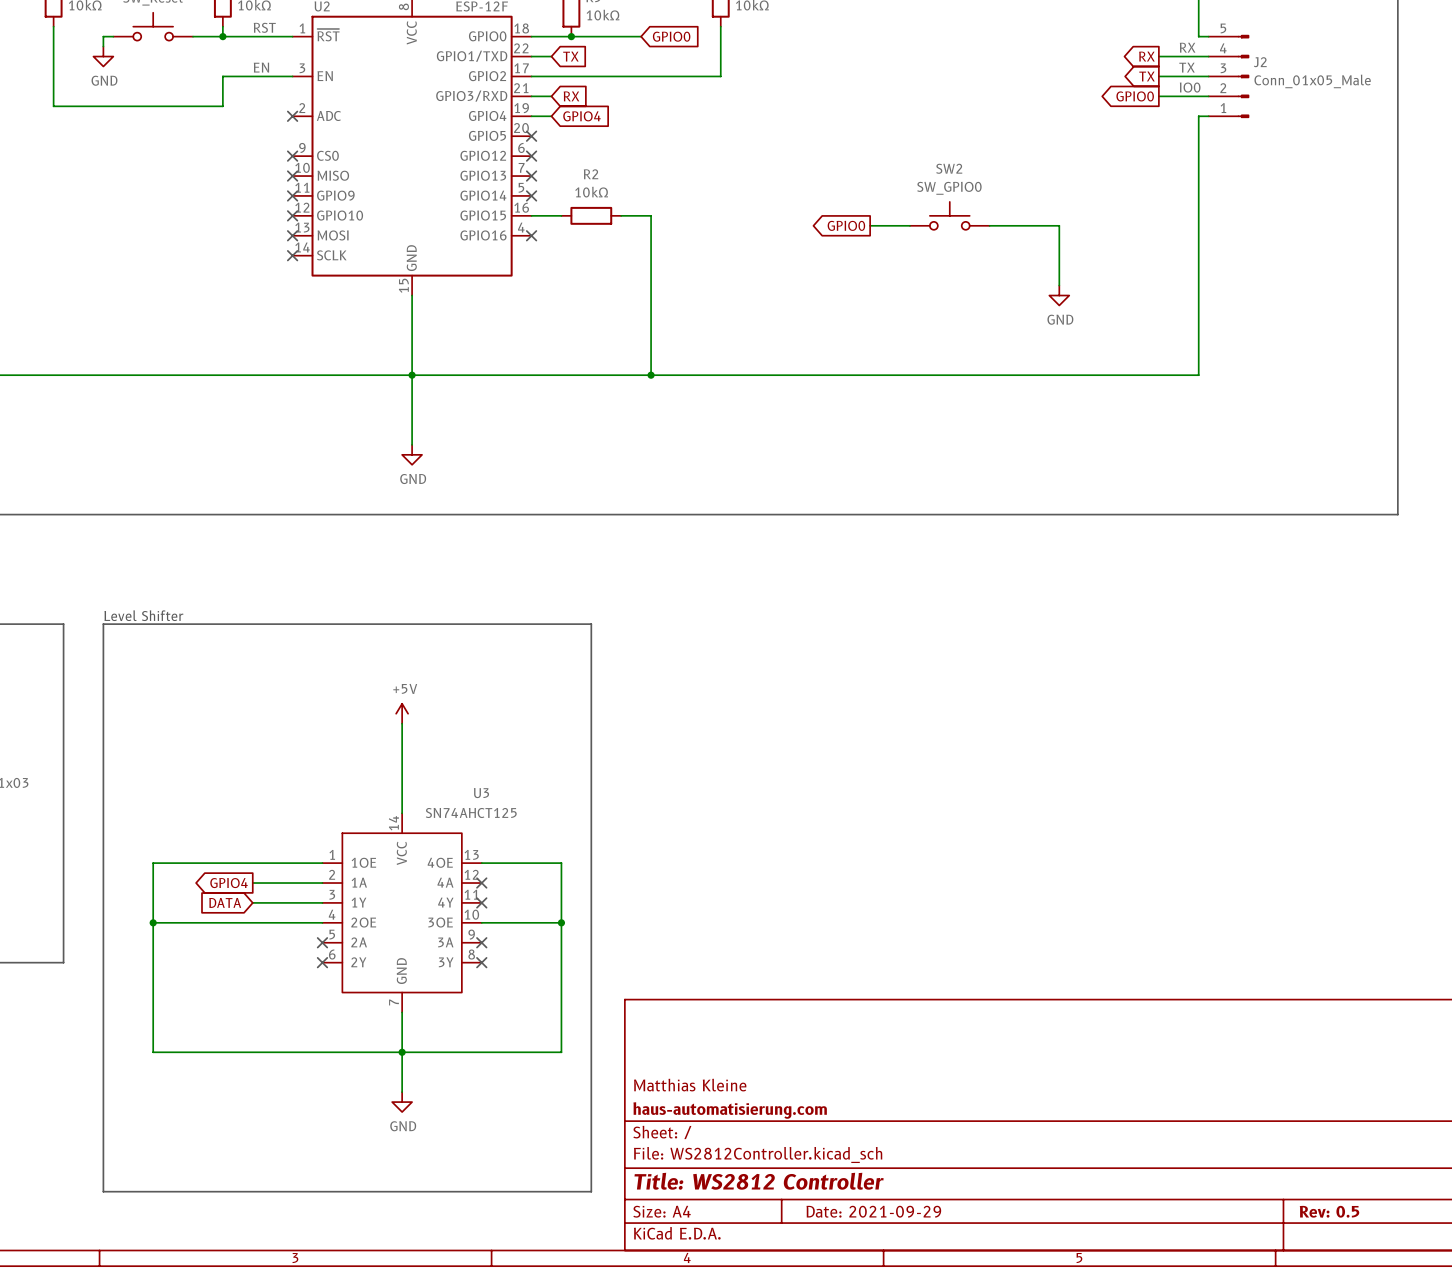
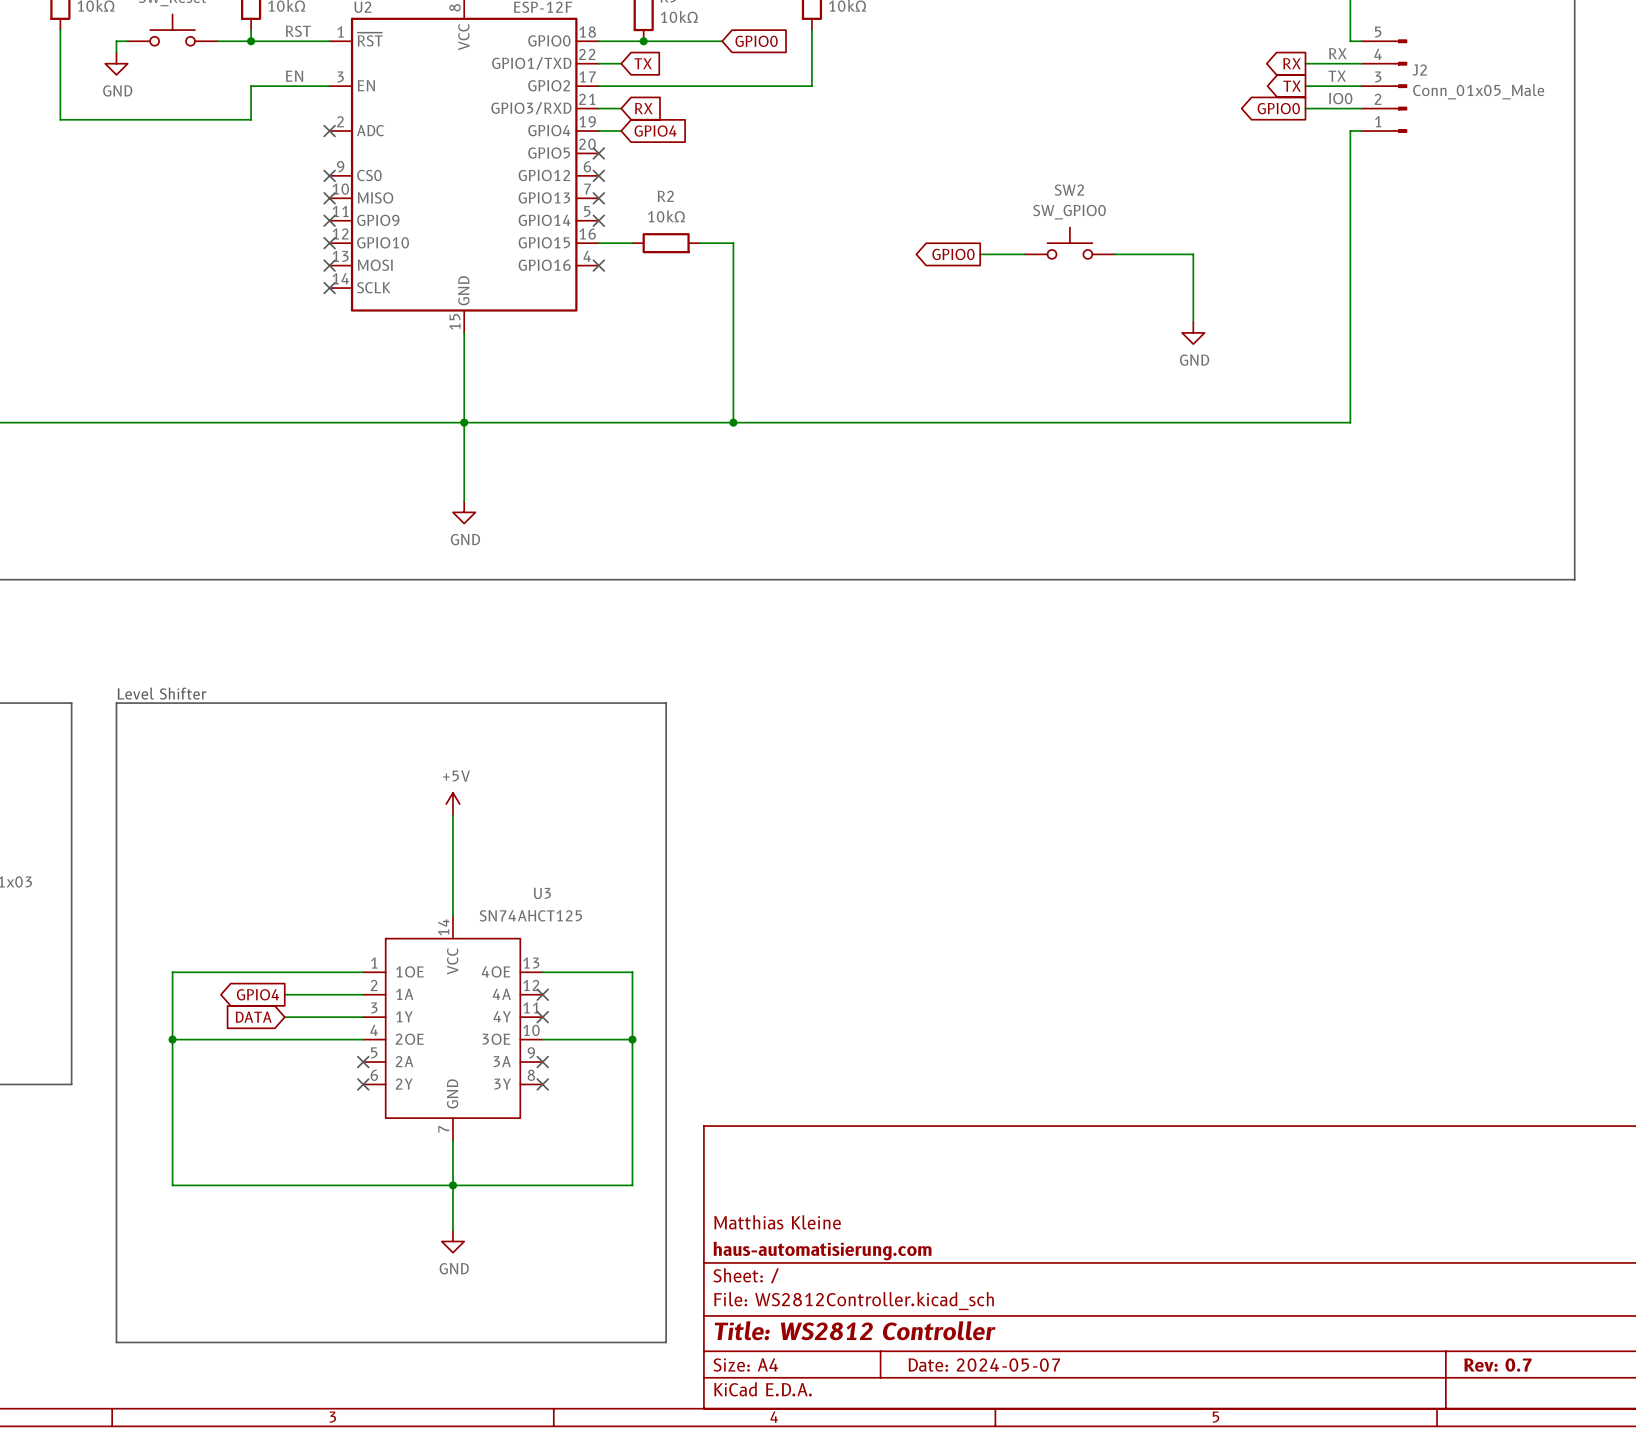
title block: Date: 2021-09-29 (873, 1211) -> Date: 2024-05-07 (984, 1365)
title block: Rev: 0.5 (1329, 1211) -> Rev: 0.7 (1497, 1365)

